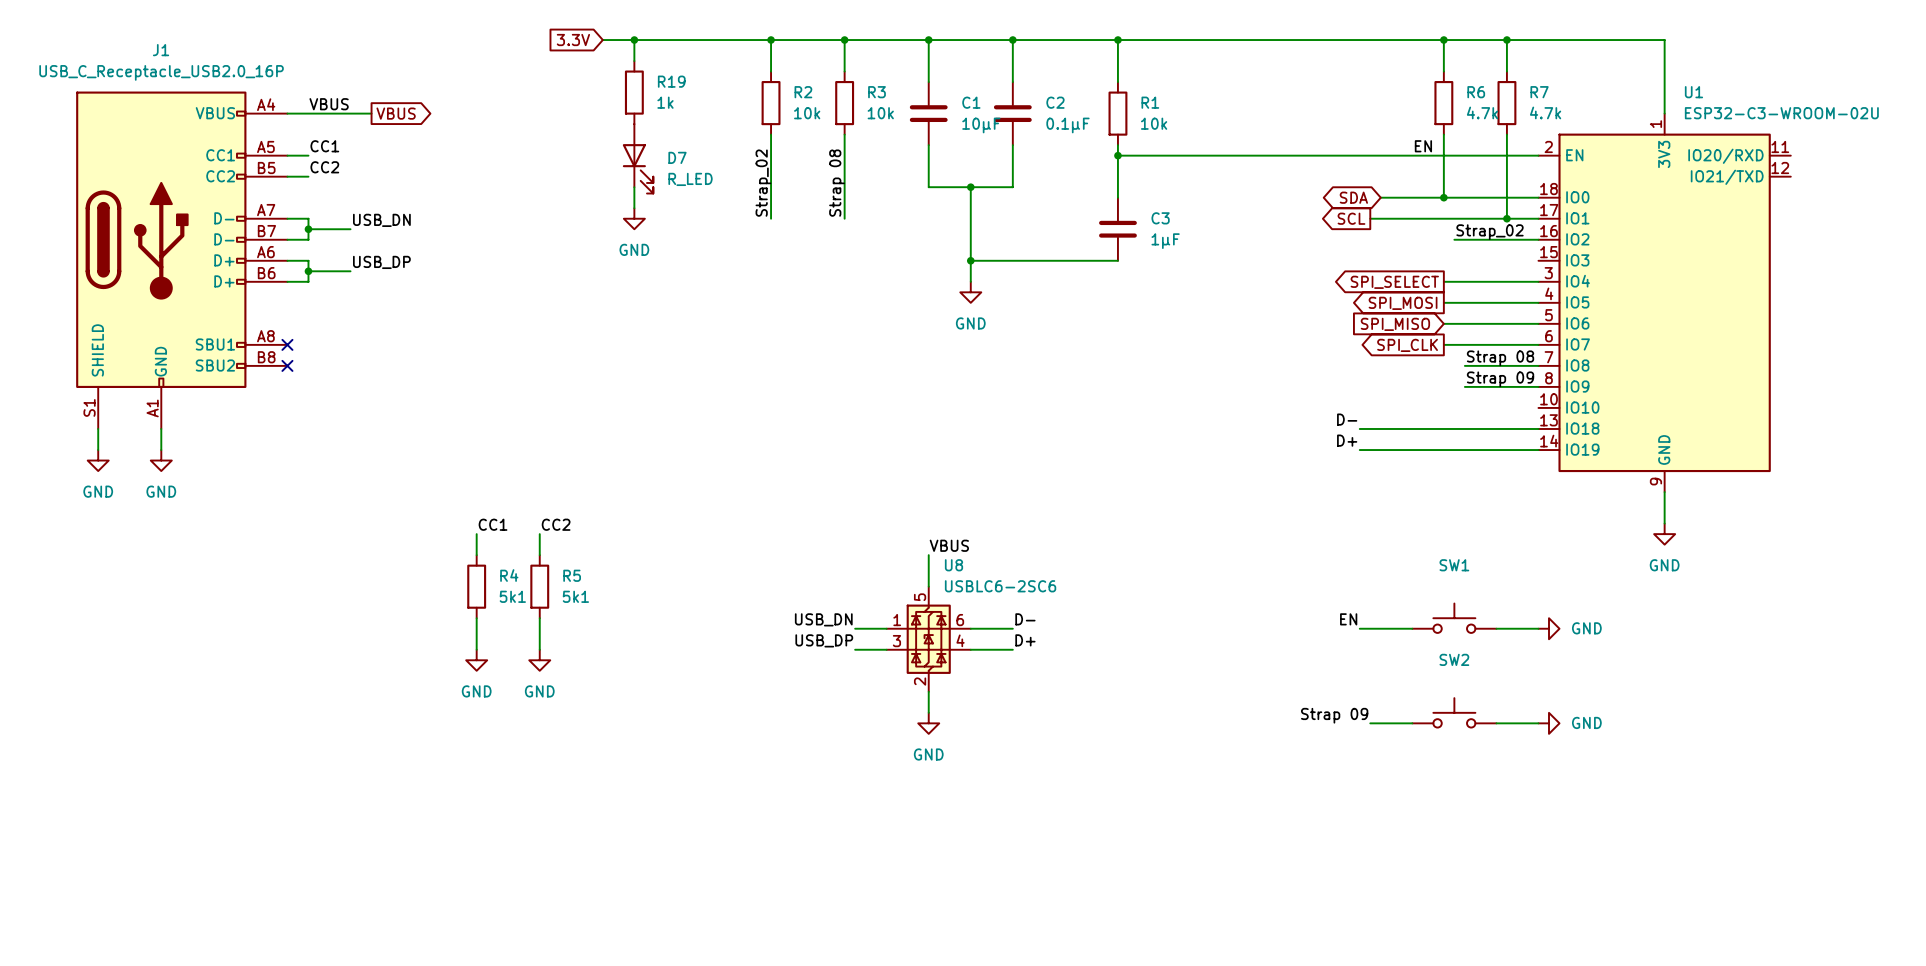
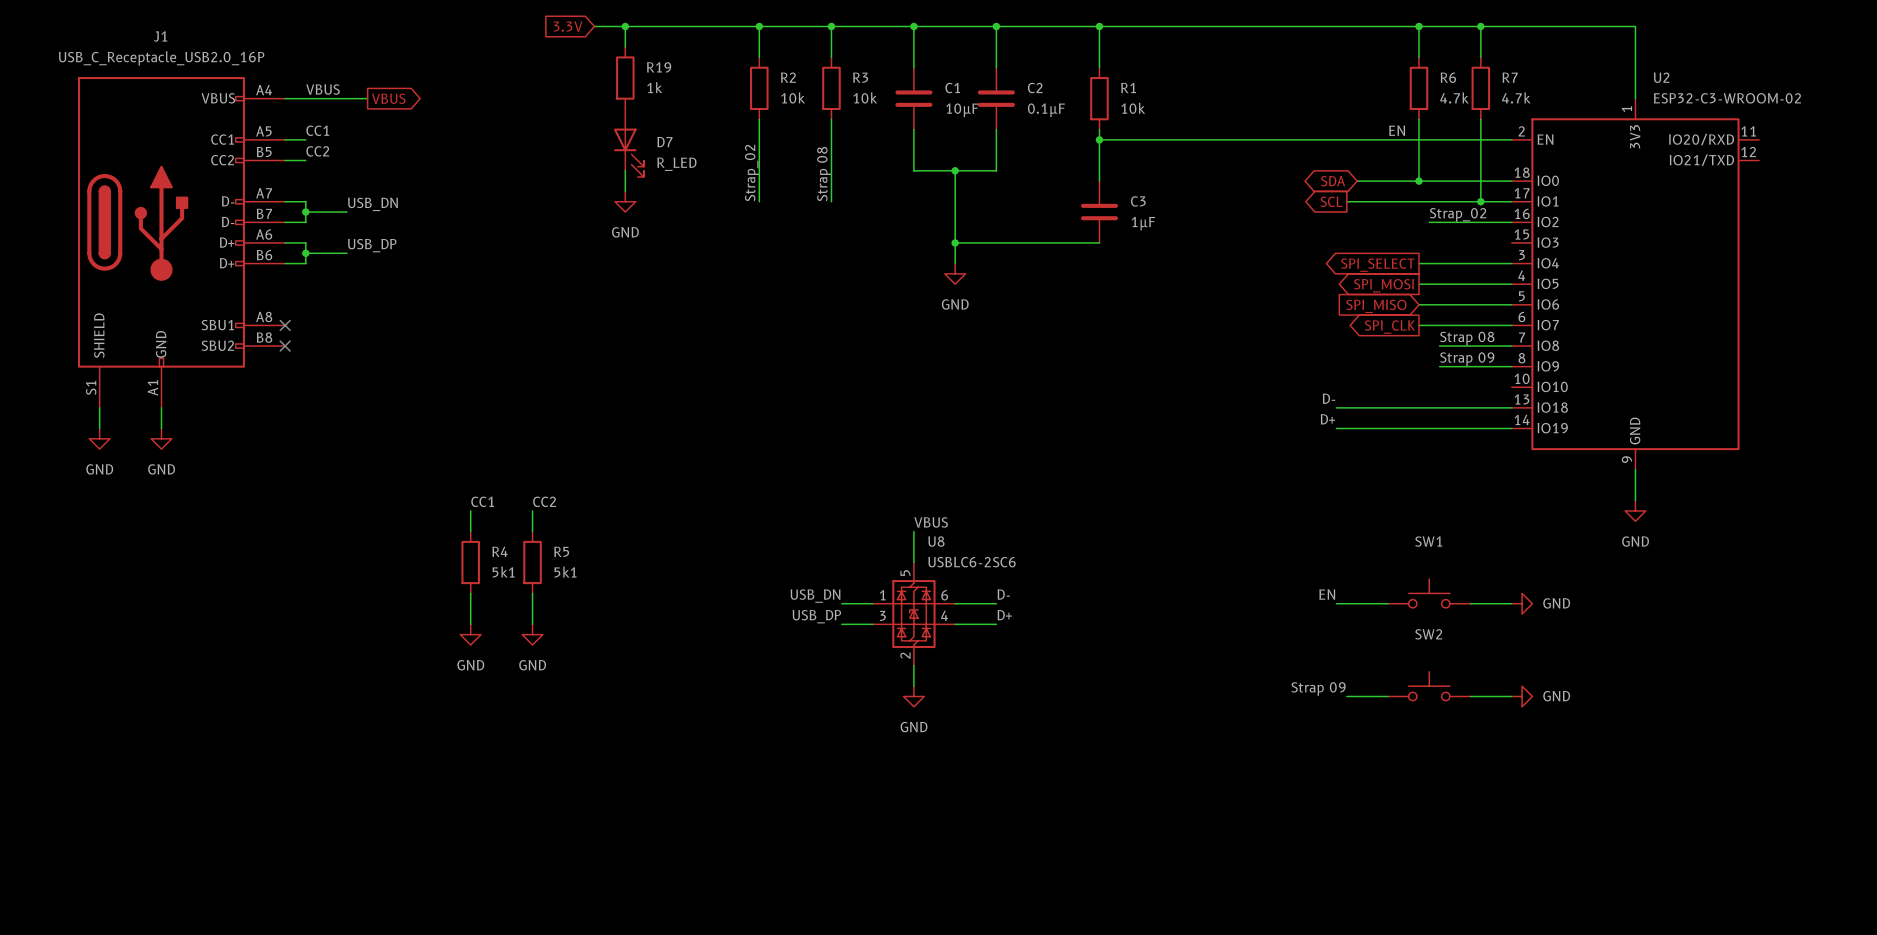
U1 name: U1 (1693, 92) -> U2 (1661, 77)
U1 value: ESP32-C3-WROOM-02U (1781, 113) -> ESP32-C3-WROOM-02 (1727, 98)

